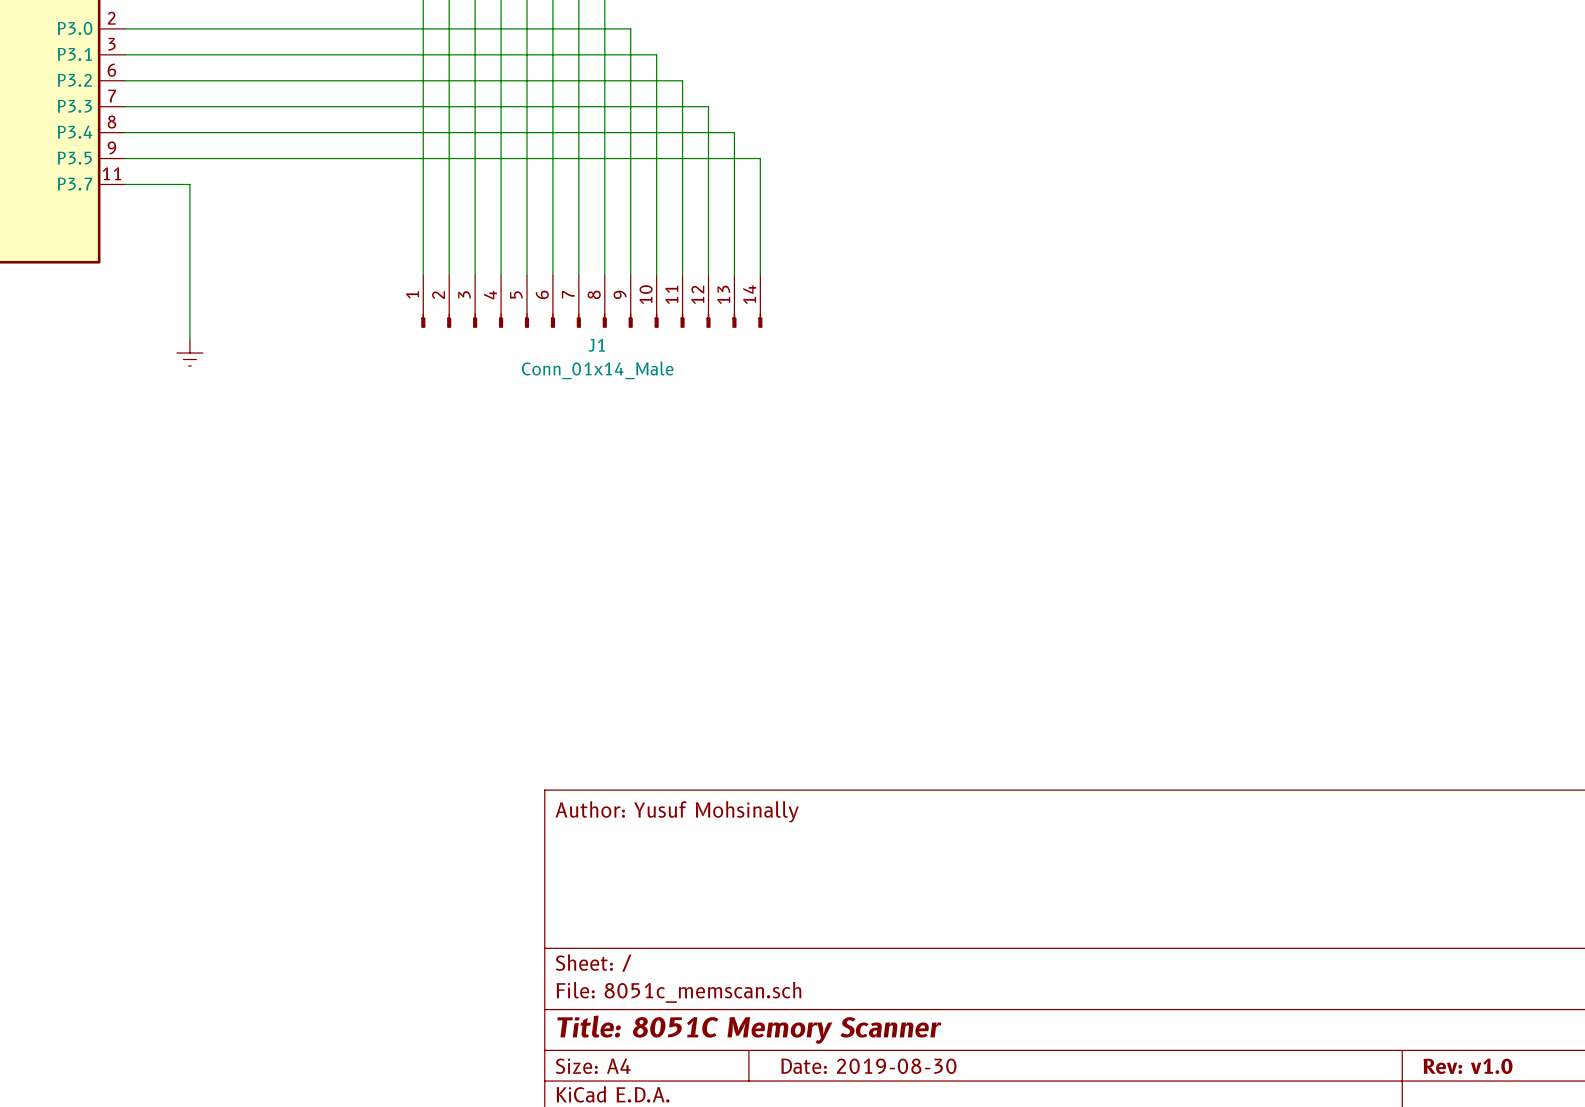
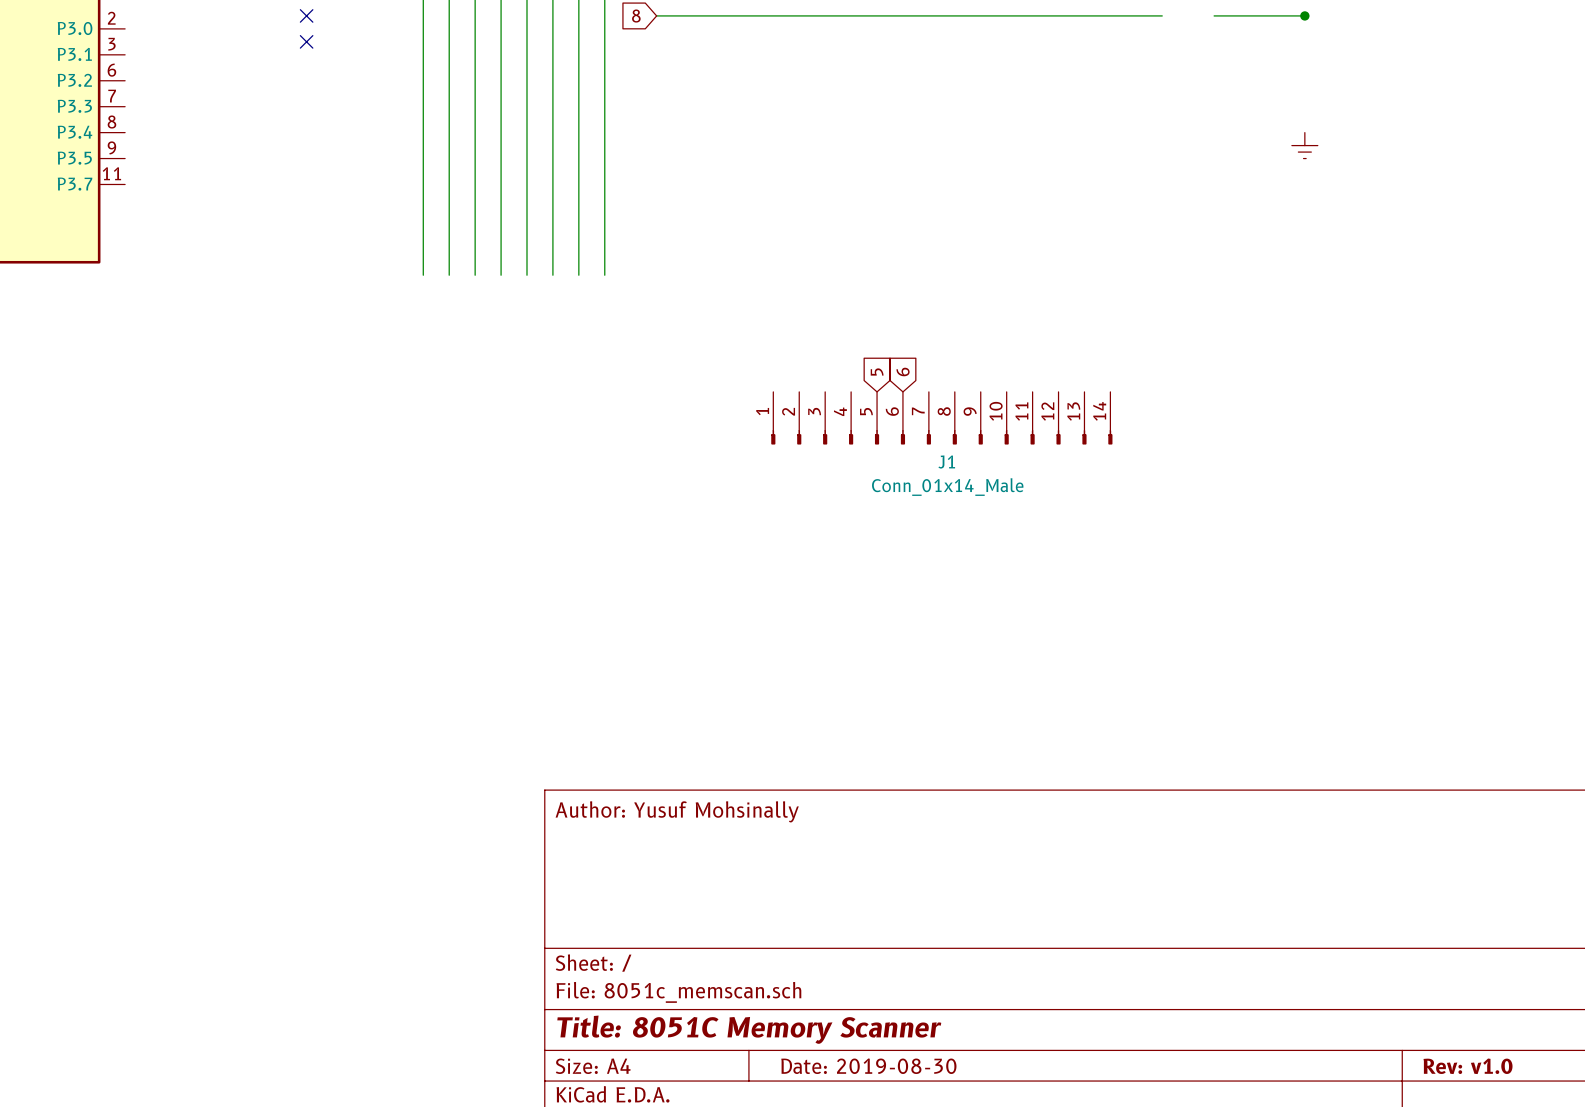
no-connect mark: none -> (306, 15)
wire: none -> (656, 15) (1162, 15)
wire: none -> (1214, 15) (1304, 15)
junction: none -> (1304, 15)
global label: none -> 8 (636, 16)
wire: (125, 28) (630, 28) (630, 275) -> none
no-connect mark: none -> (306, 41)
wire: (125, 54) (656, 54) (656, 275) -> none
wire: (125, 80) (682, 80) (682, 275) -> none
wire: (125, 106) (708, 106) (708, 275) -> none
wire: (125, 132) (734, 132) (734, 275) -> none
power symbol: none -> (1304, 145)
wire: (125, 158) (760, 158) (760, 275) -> none
wire: (125, 184) (189, 184) (189, 340) -> none
J1 position: (591, 301) -> (941, 418)
power symbol: (189, 353) -> none
global label: none -> 5 (877, 371)
global label: none -> 6 (903, 371)

